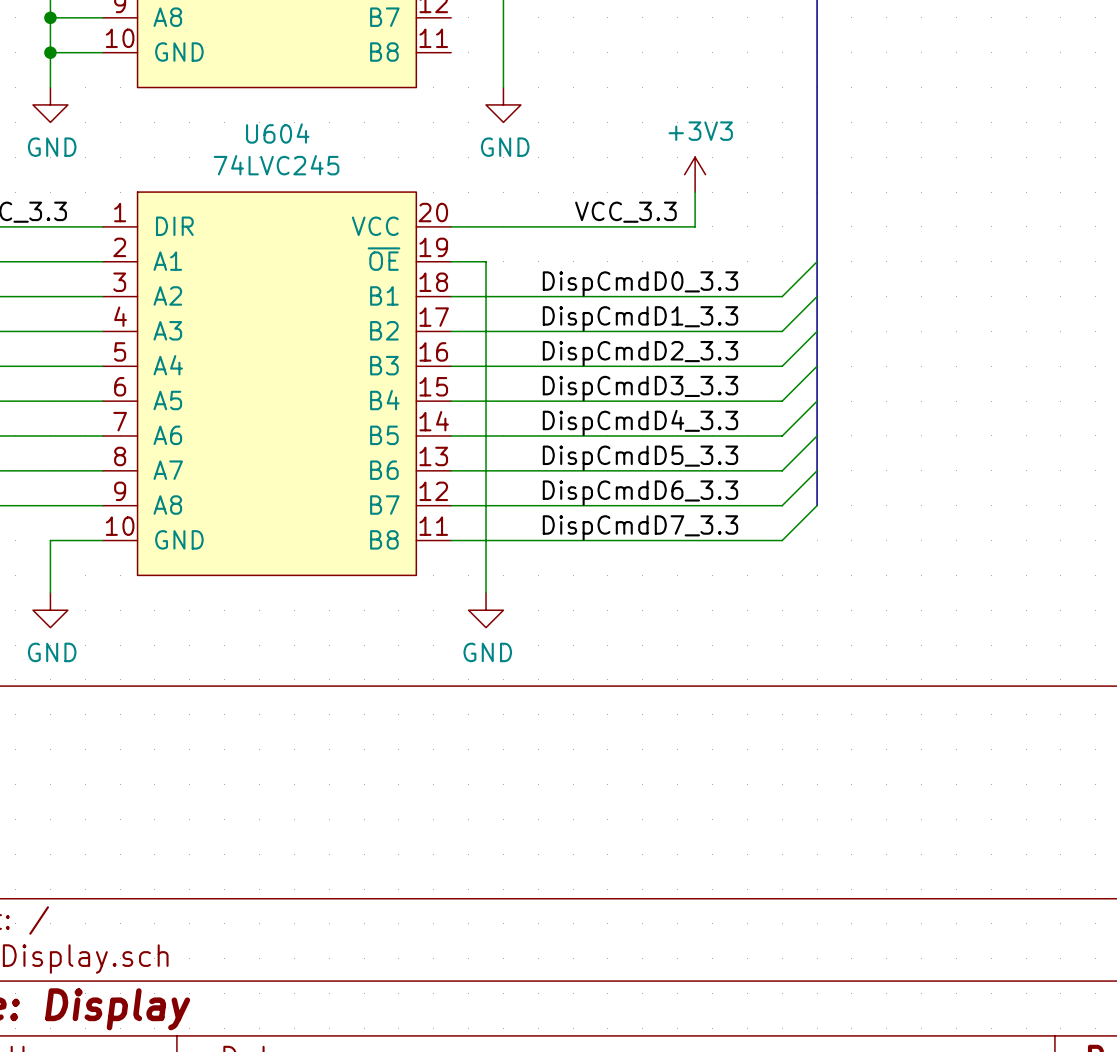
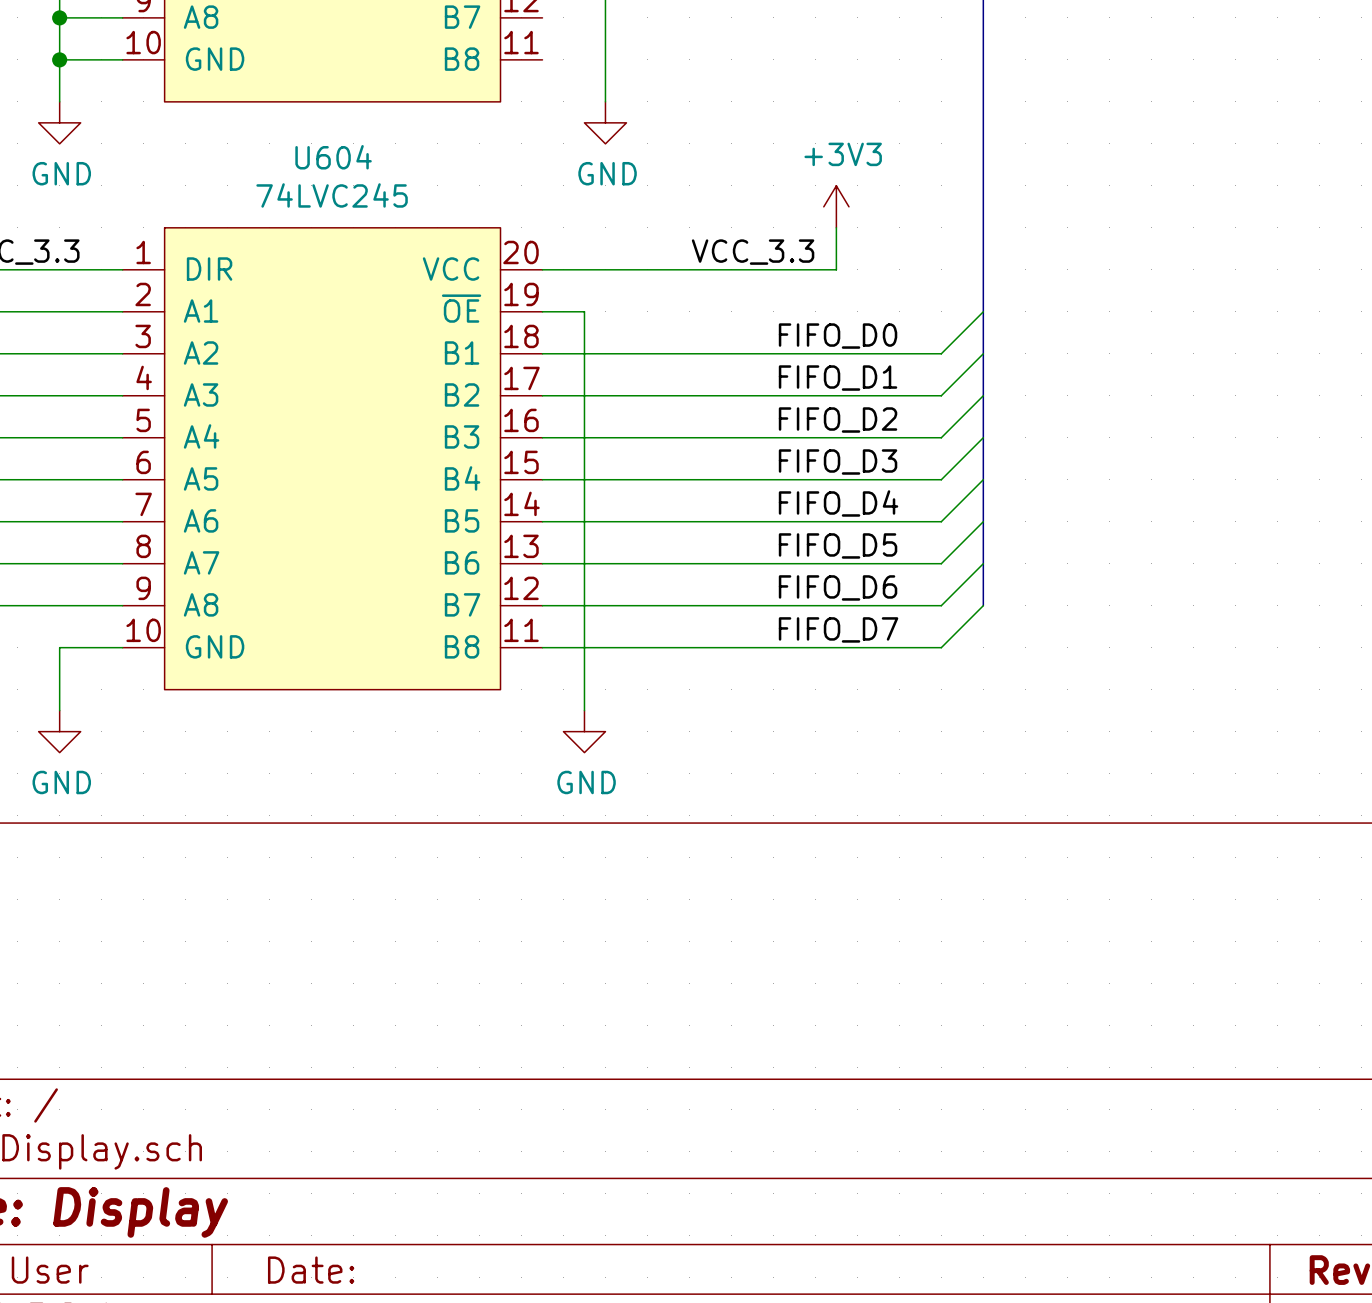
label: none -> FIFO_D0 (838, 336)
label: DispCmdD0_3.3 (640, 283) -> none
label: none -> FIFO_D1 (838, 378)
label: DispCmdD1_3.3 (640, 318) -> none
label: none -> FIFO_D2 (838, 420)
label: DispCmdD2_3.3 (640, 353) -> none
label: none -> FIFO_D3 (838, 461)
label: DispCmdD3_3.3 (640, 388) -> none
label: none -> FIFO_D4 (838, 503)
label: DispCmdD4_3.3 (640, 422) -> none
label: none -> FIFO_D5 (838, 545)
label: DispCmdD5_3.3 (640, 458) -> none
label: none -> FIFO_D6 (838, 587)
label: DispCmdD6_3.3 (640, 493) -> none
label: none -> FIFO_D7 (838, 629)
label: DispCmdD7_3.3 (640, 527) -> none

